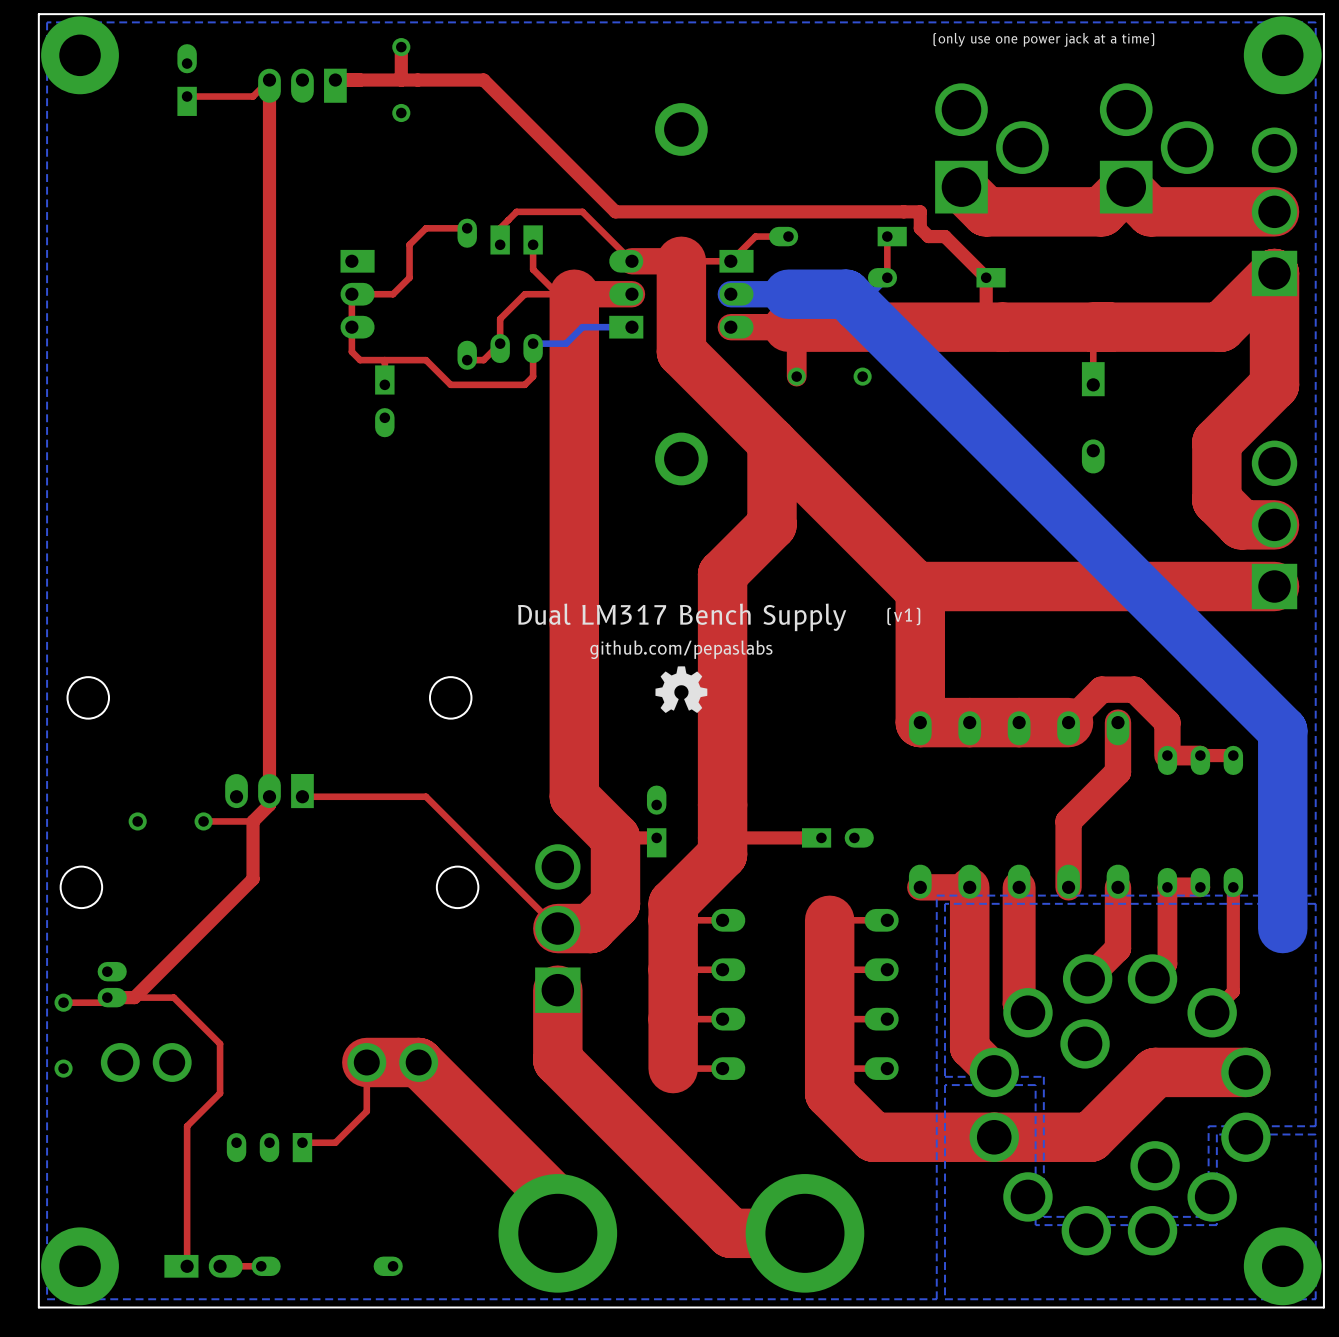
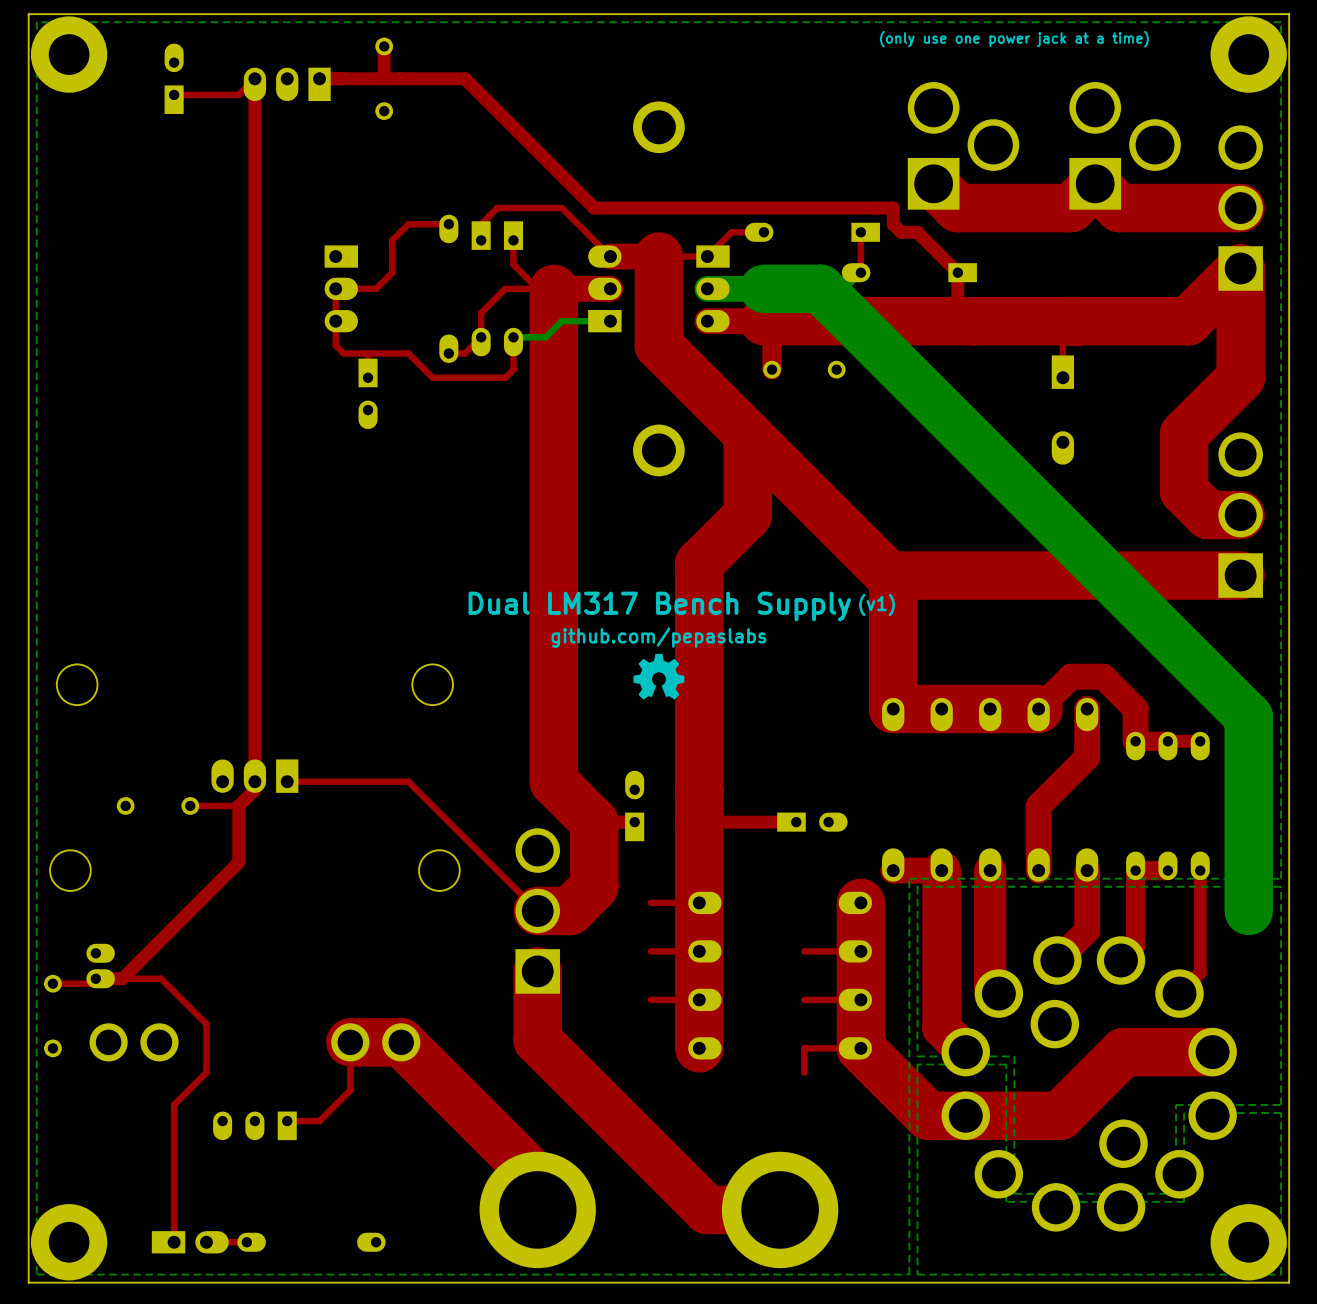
top track: (722, 854) (673, 903) (673, 1068) (722, 1068) -> (699, 838) (699, 1048)
top track: (887, 920) (829, 920) (829, 1093) (873, 1137) (956, 1137) -> (860, 902) (860, 1048) (928, 1115)

